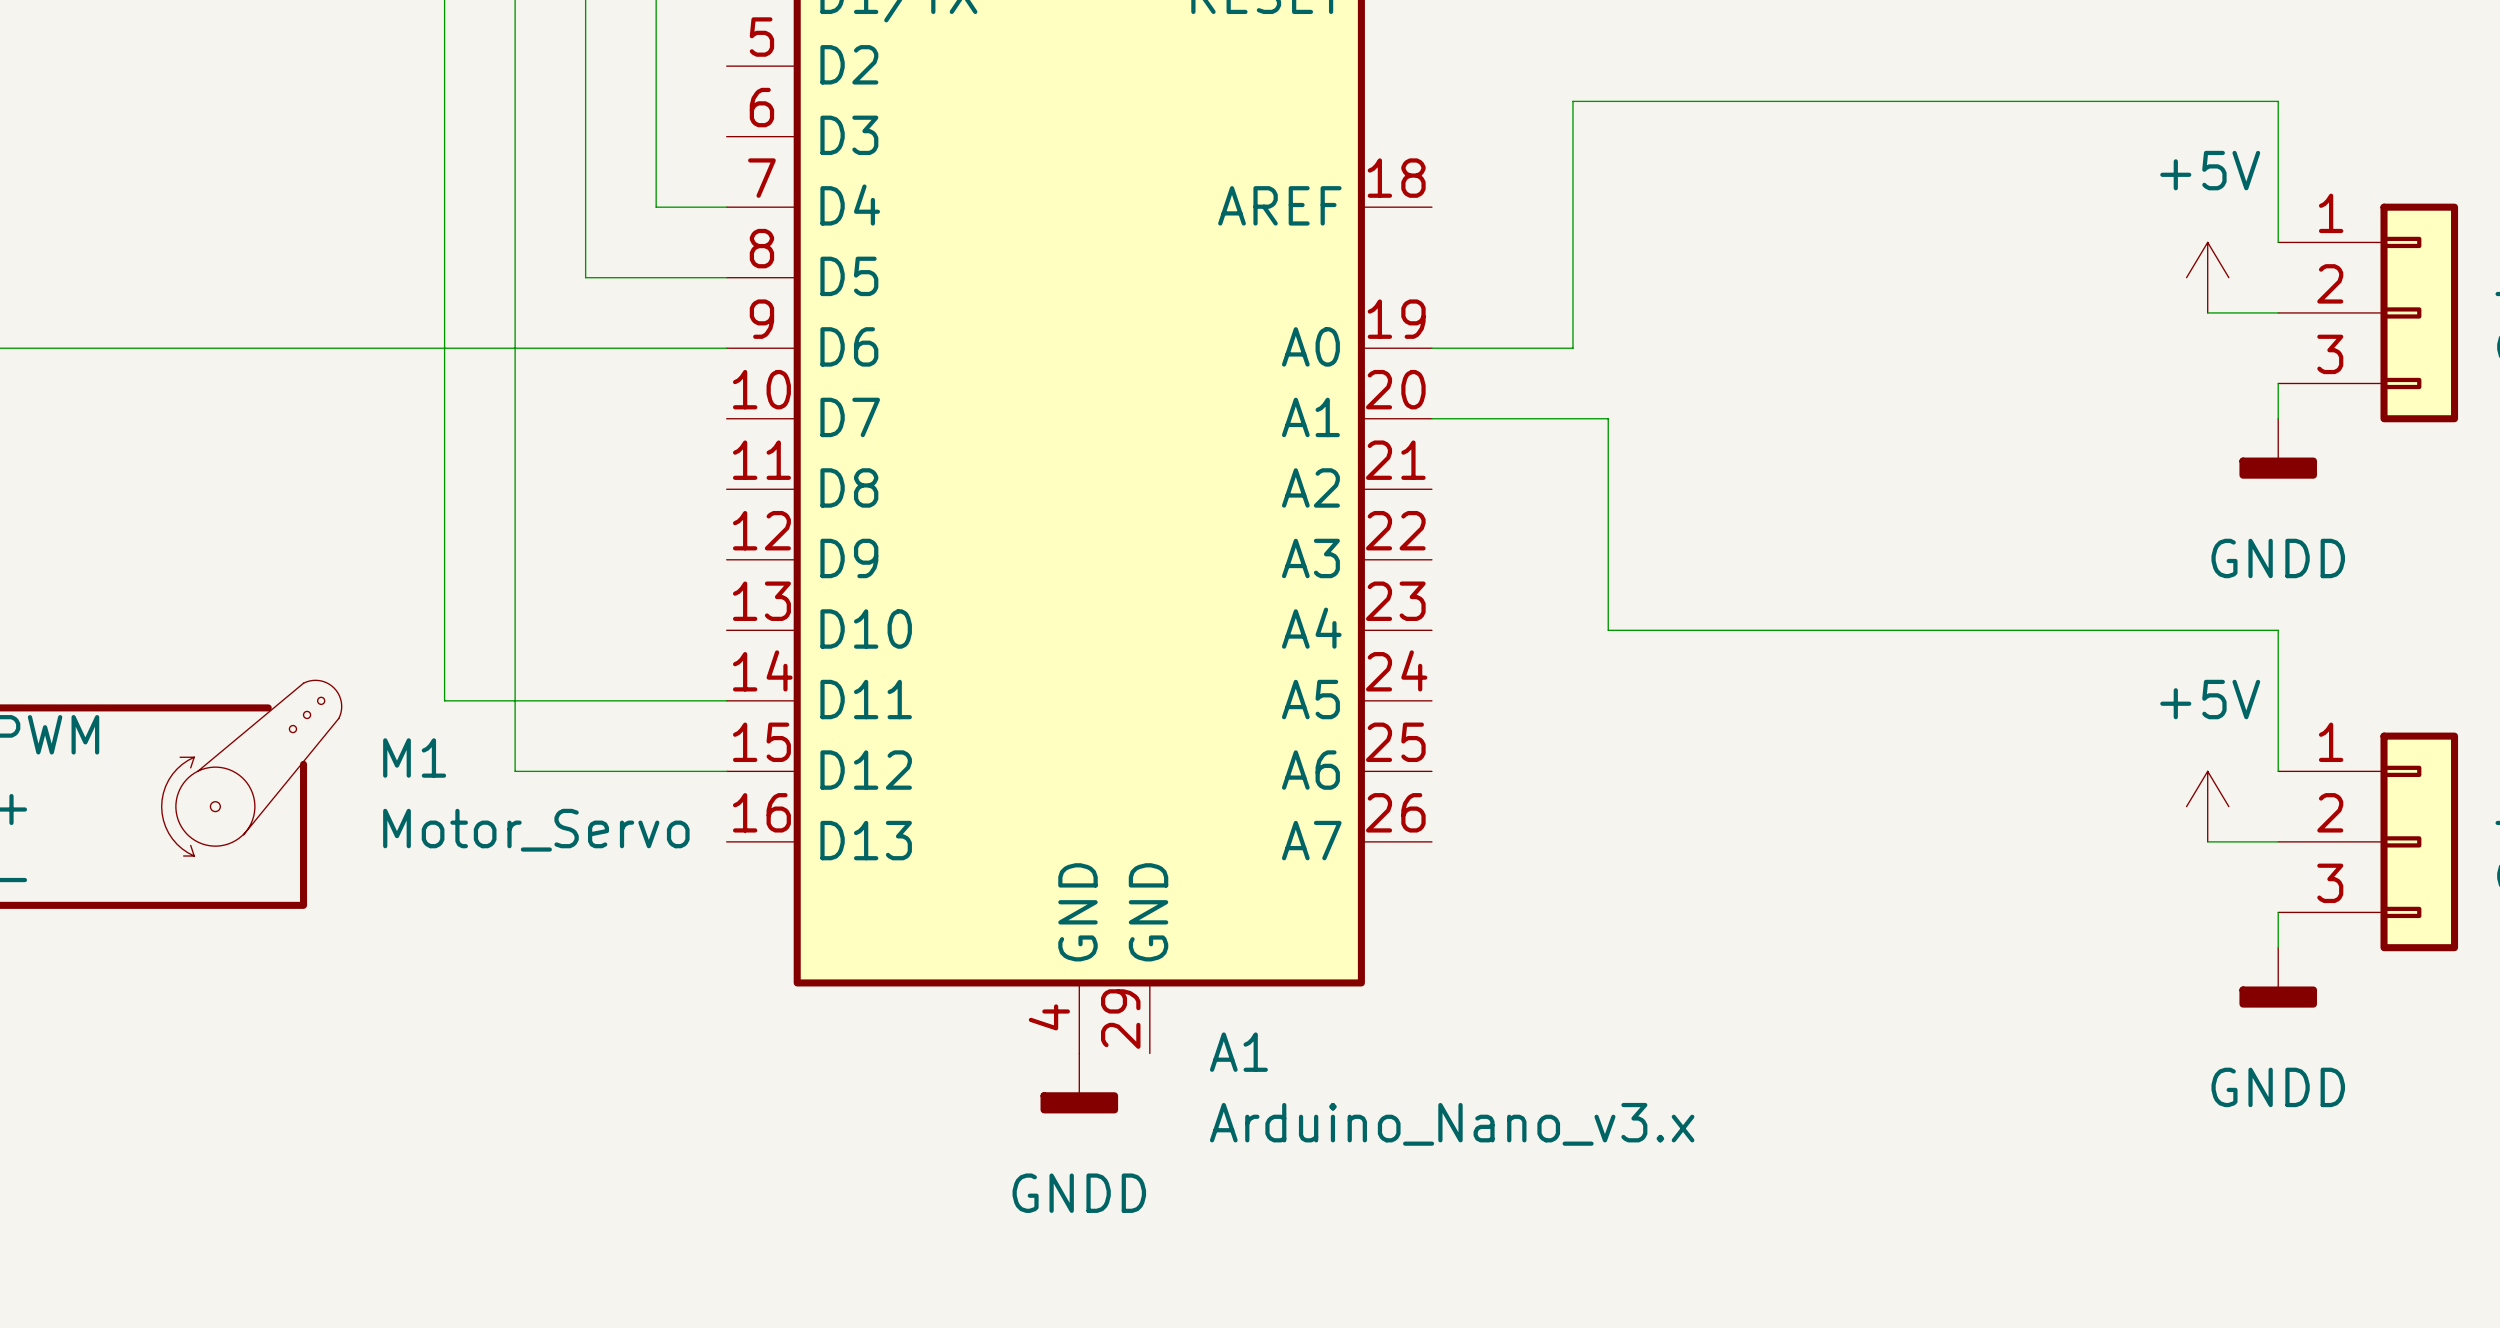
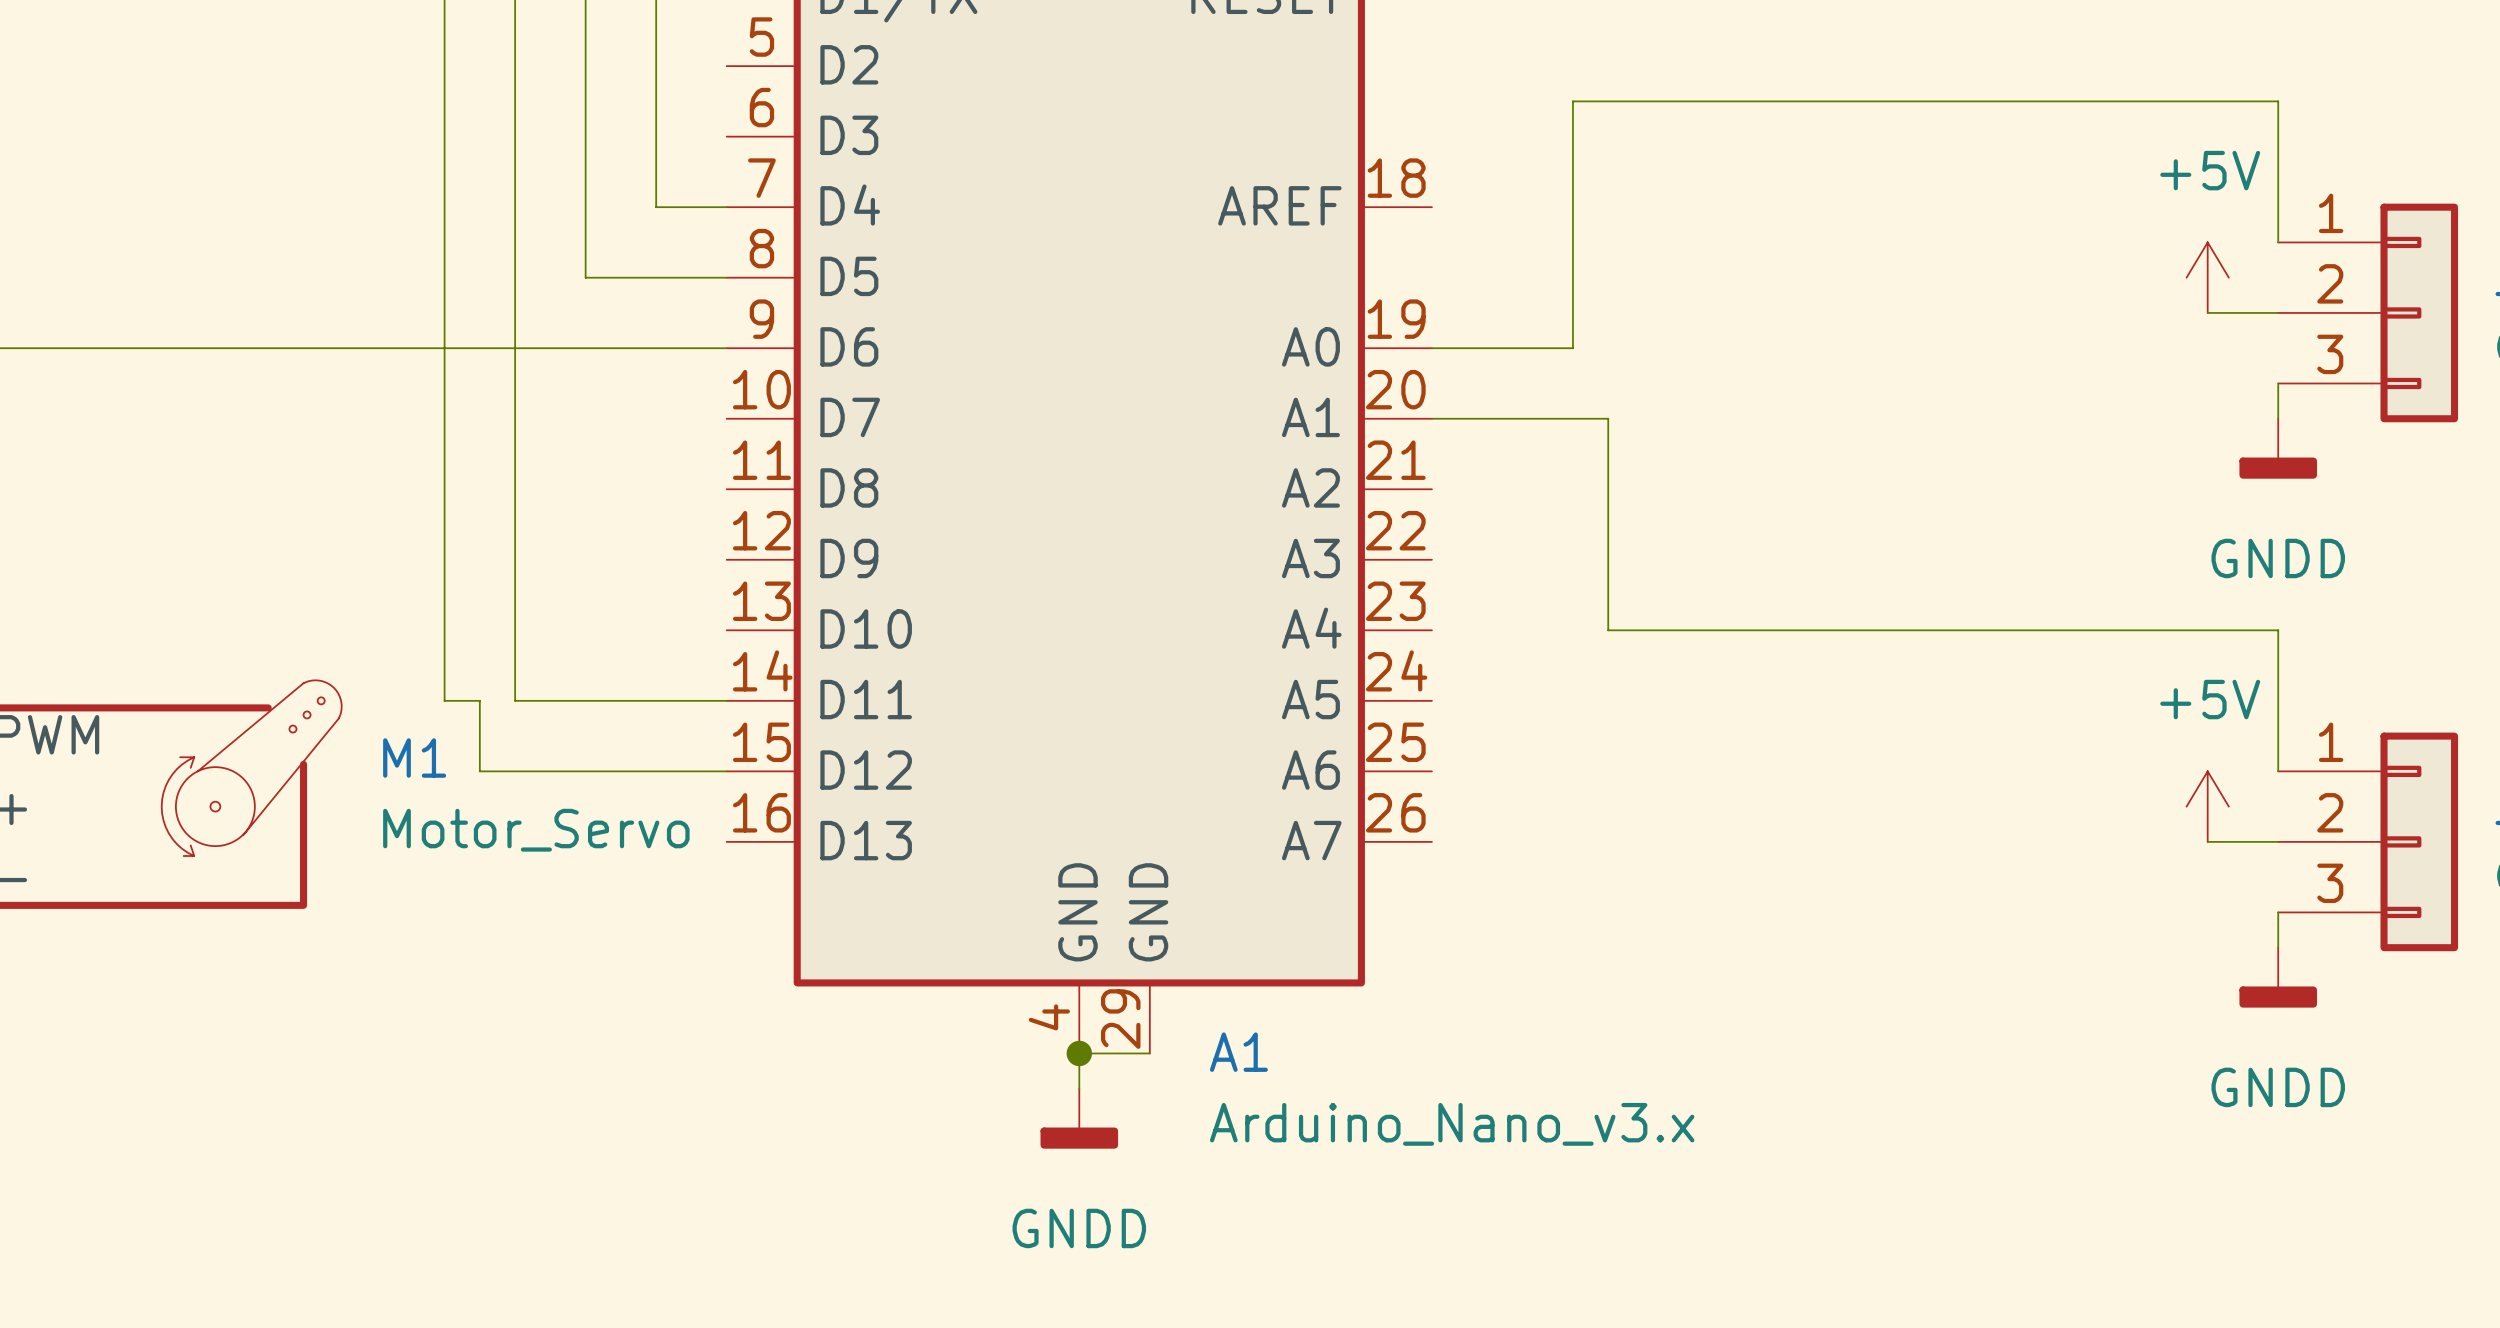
wire: (479, 700) (515, 700) (515, 771) -> (479, 700) (479, 771) (515, 771)
junction: none -> (1079, 1053)
wire: none -> (1149, 1053) (1079, 1053) (1079, 1088)
power symbol position: GNDD (1079, 1083) -> GNDD (1079, 1118)

